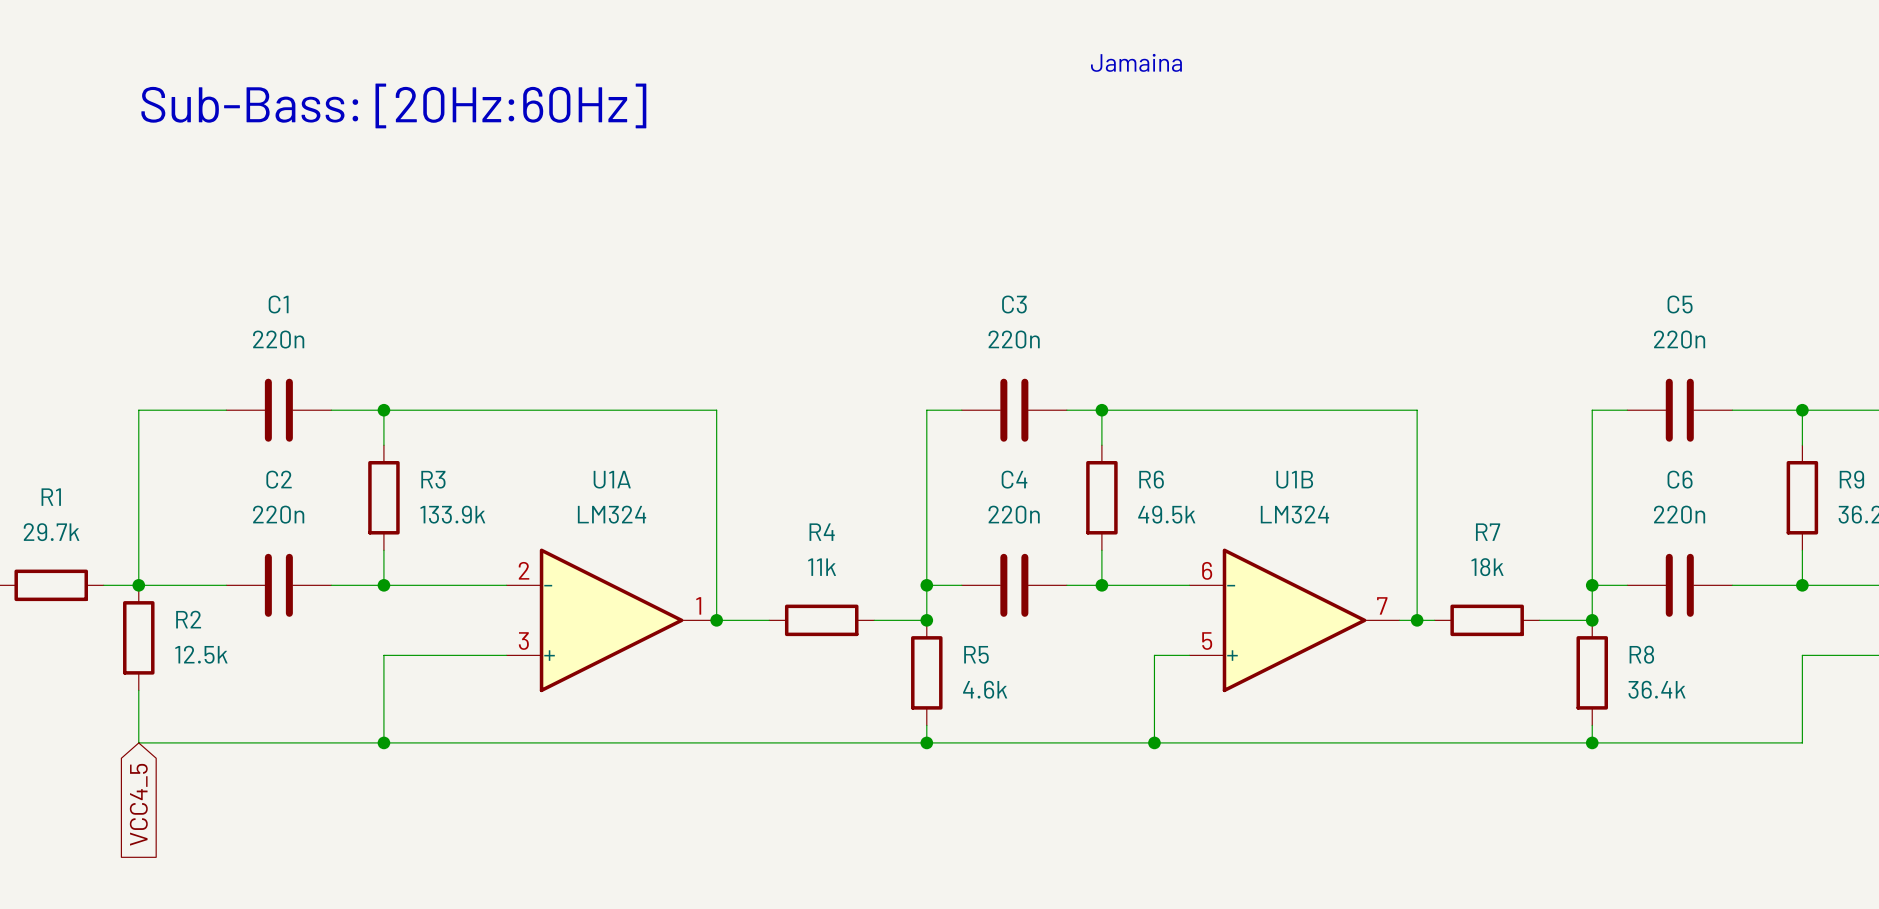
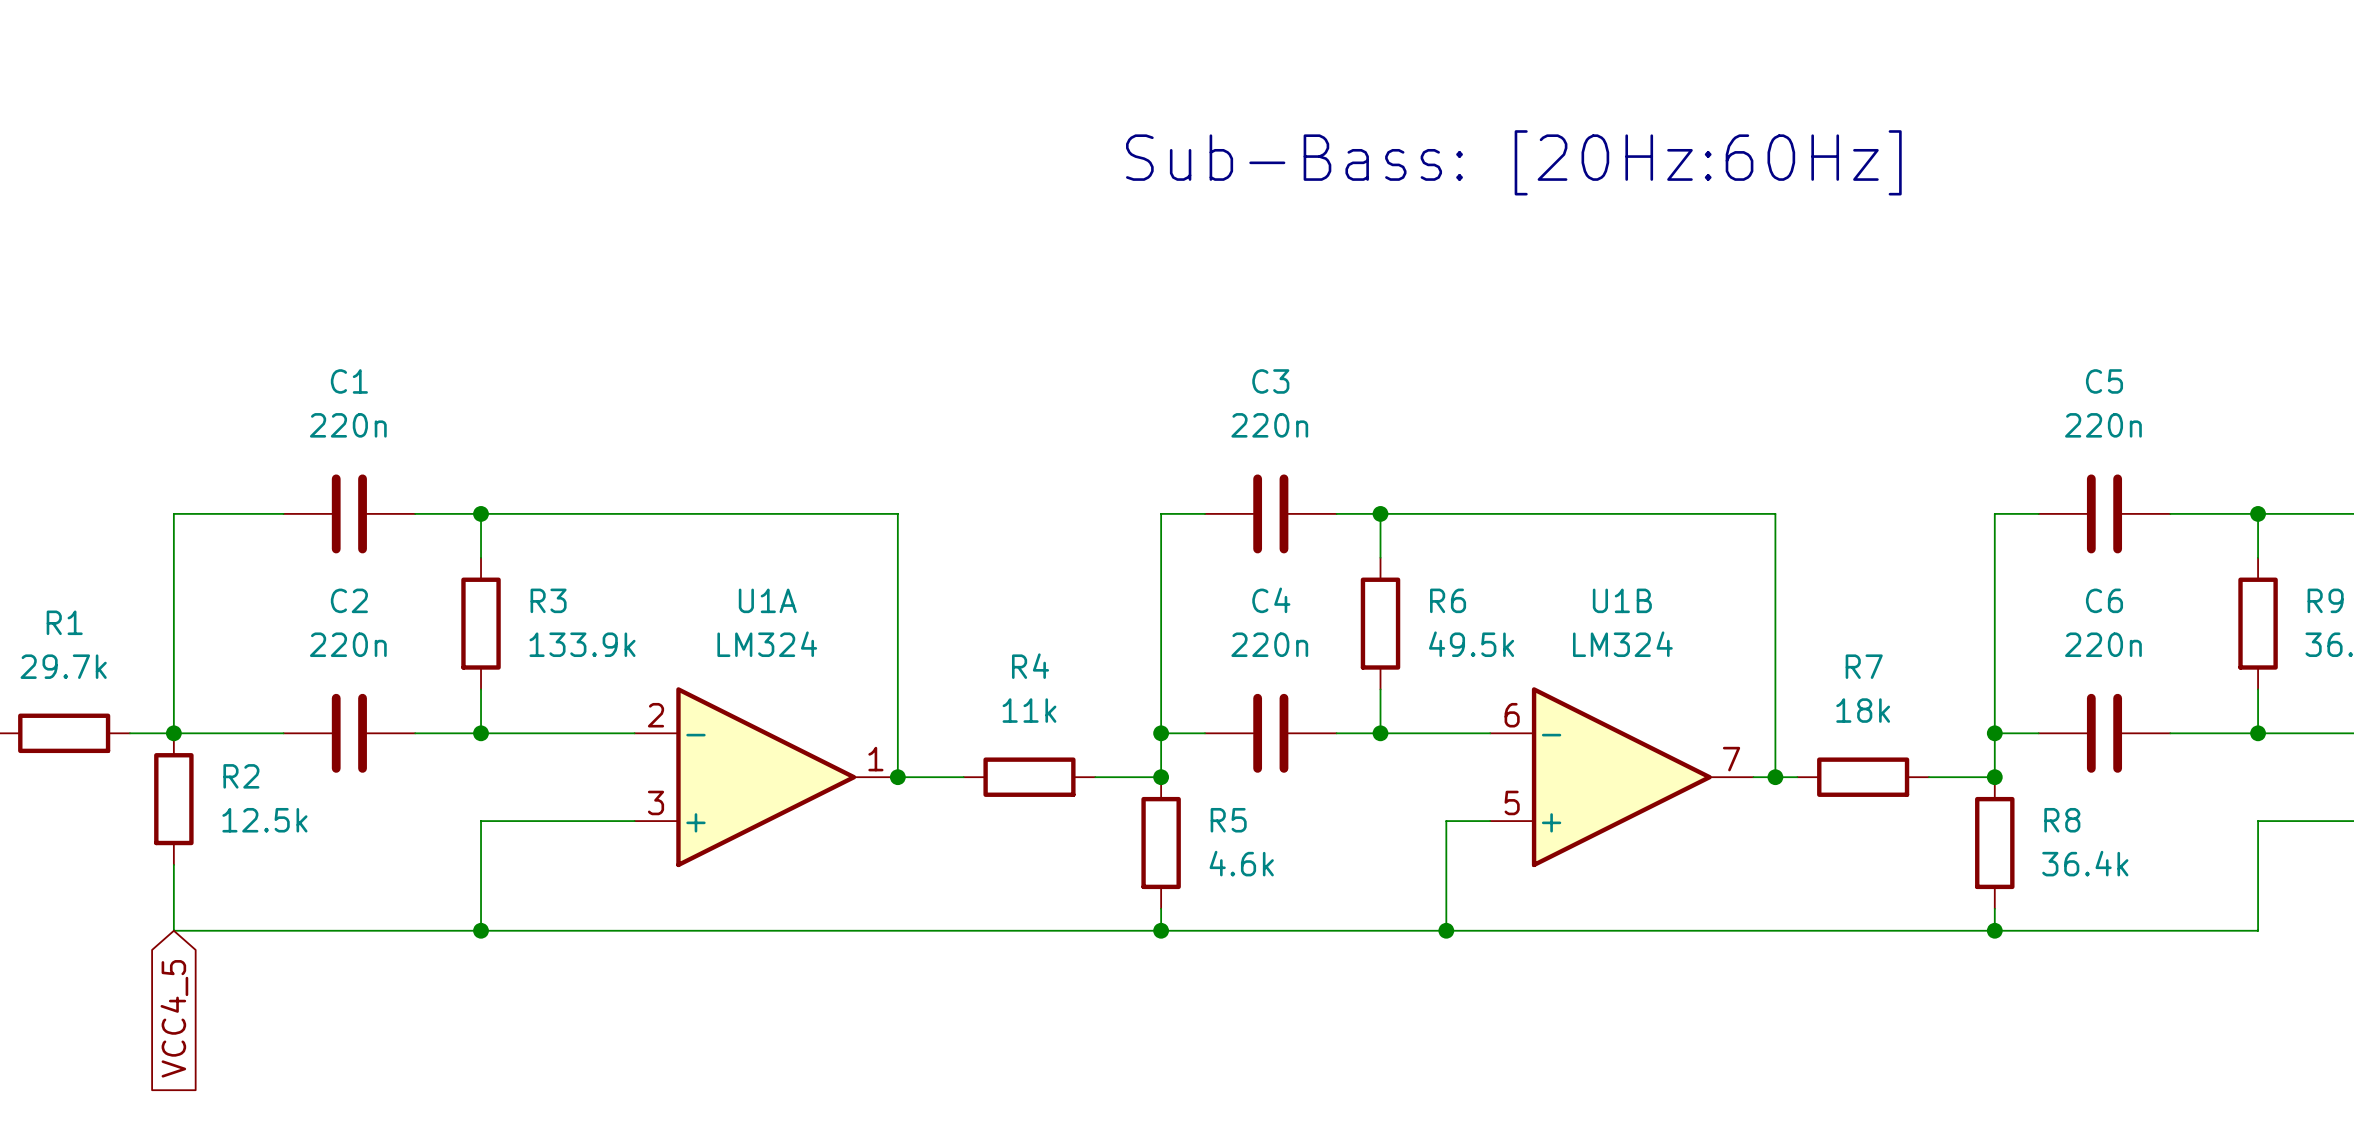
text: Jamaina (1136, 62) -> none
text: Sub-Bass: [20Hz:60Hz] (393, 105) -> none
text: none -> Sub-Bass: [20Hz:60Hz] (1513, 162)

